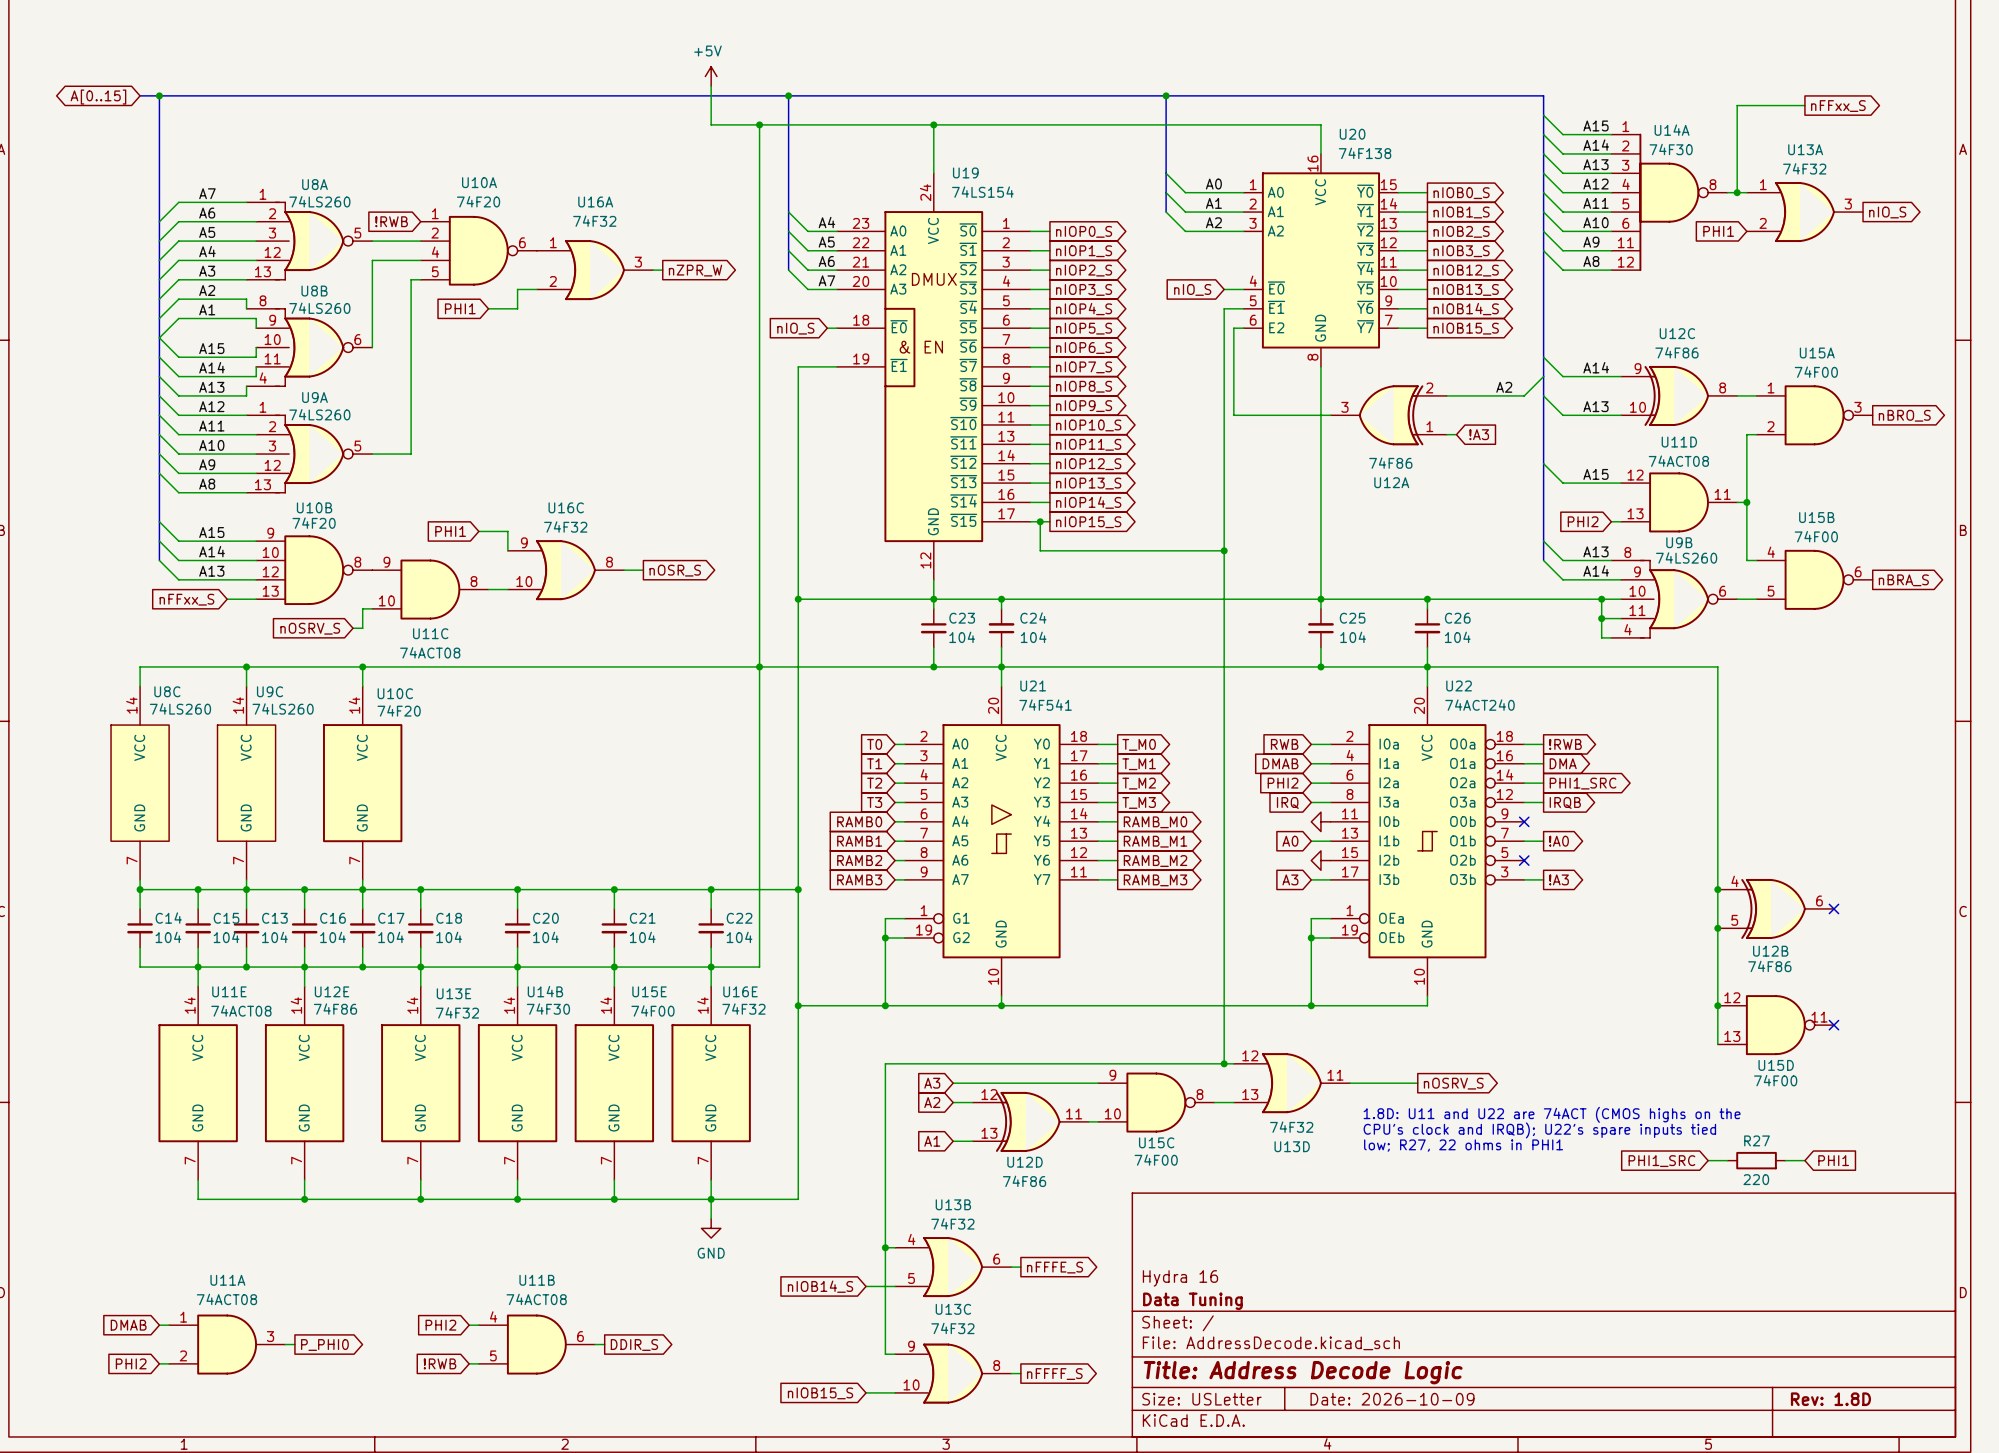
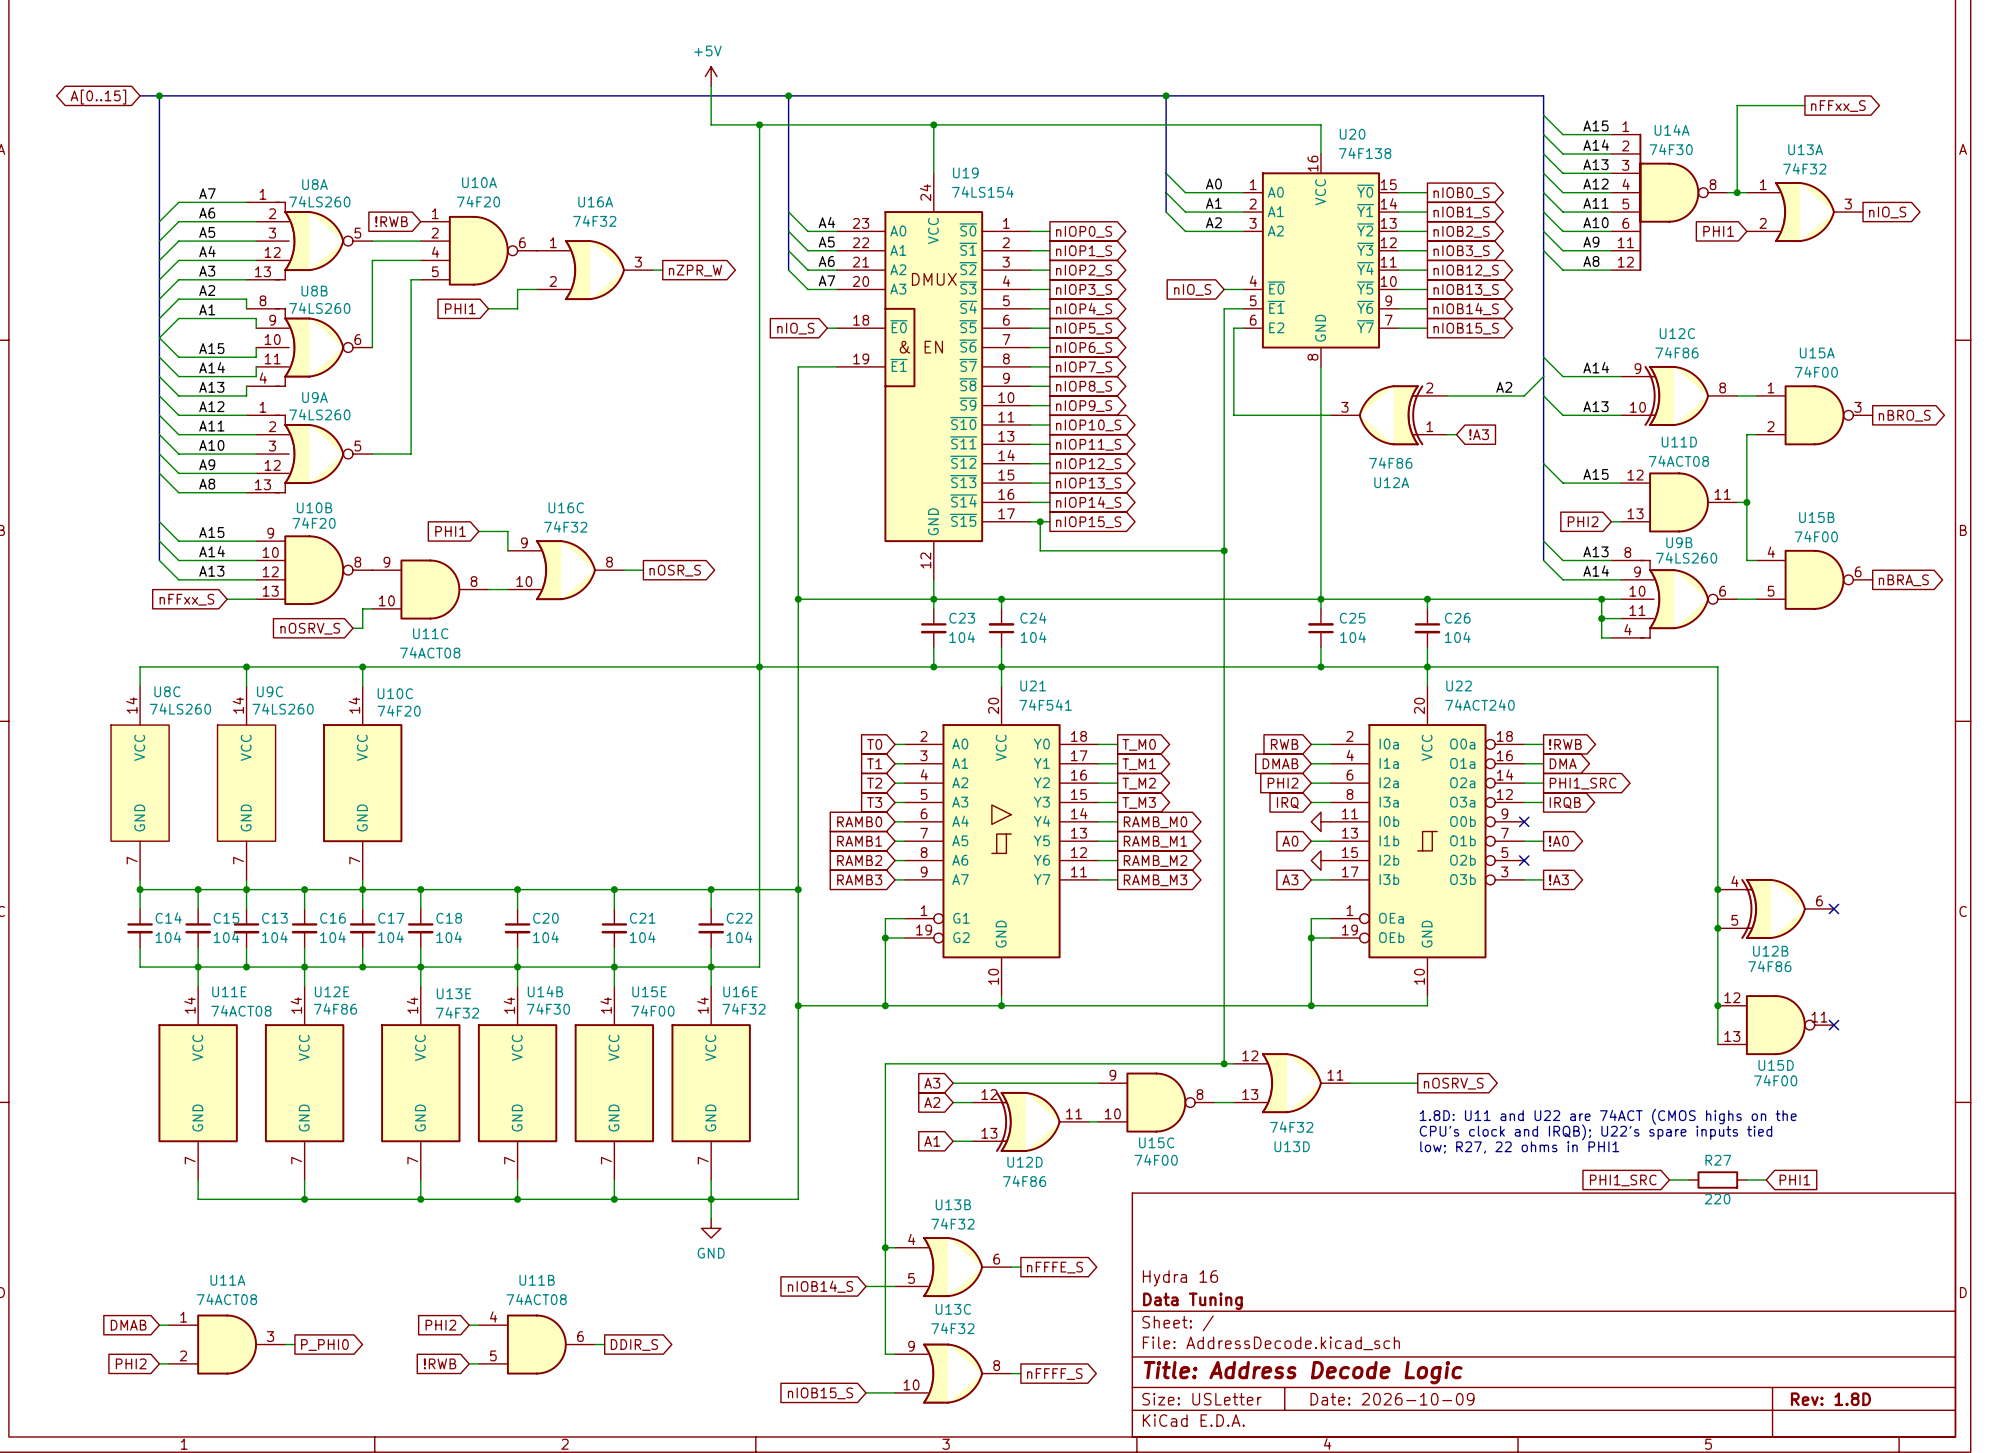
text position: 1.8D: U11 and U22 are 74ACT (CMOS highs on the (1552, 1114) -> 1.8D: U11 and U22 are 74ACT (CMOS highs on the (1608, 1116)
text position: CPU's clock and IRQB); U22's spare inputs tied (1539, 1130) -> CPU's clock and IRQB); U22's spare inputs tied (1595, 1132)
text position: low; R27, 22 ohms in PHI1 (1463, 1145) -> low; R27, 22 ohms in PHI1 (1519, 1147)
wire: (1708, 1160) (1727, 1160) -> (1669, 1179) (1688, 1179)
R27 position: (1756, 1160) -> (1717, 1179)
wire: (1785, 1160) (1804, 1160) -> (1746, 1179) (1766, 1179)
global label position: PHI1 (1833, 1160) -> PHI1 (1794, 1179)
global label position: PHI1_SRC (1661, 1161) -> PHI1_SRC (1623, 1180)

